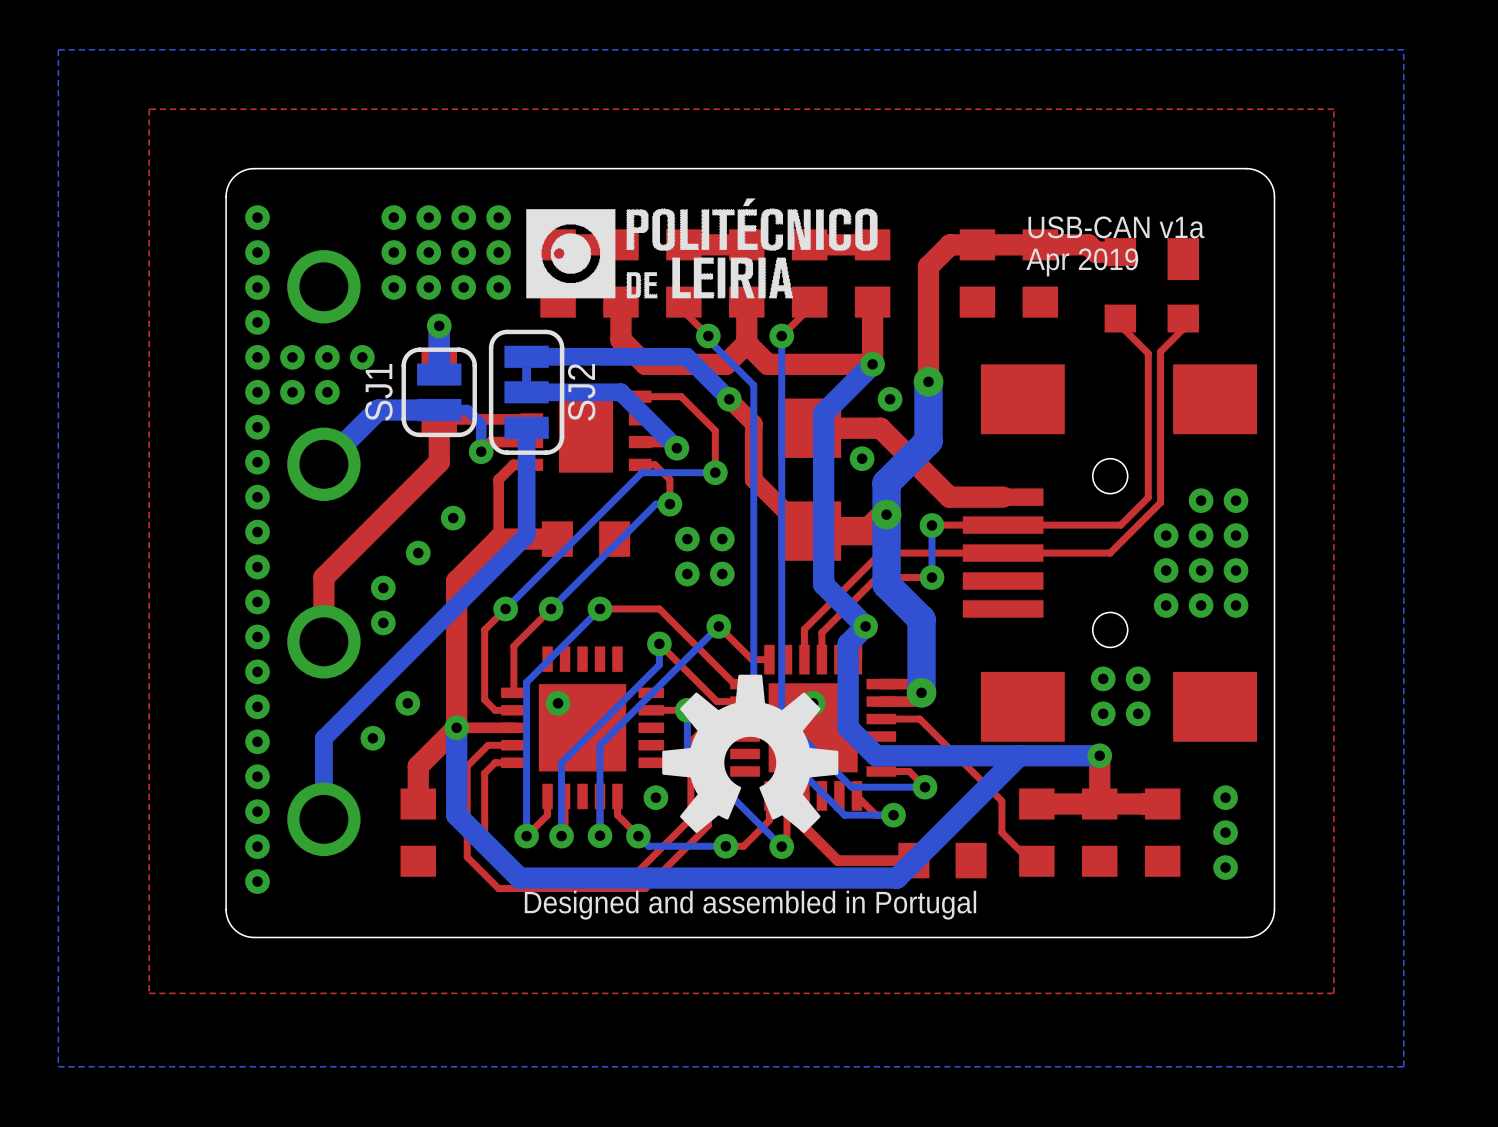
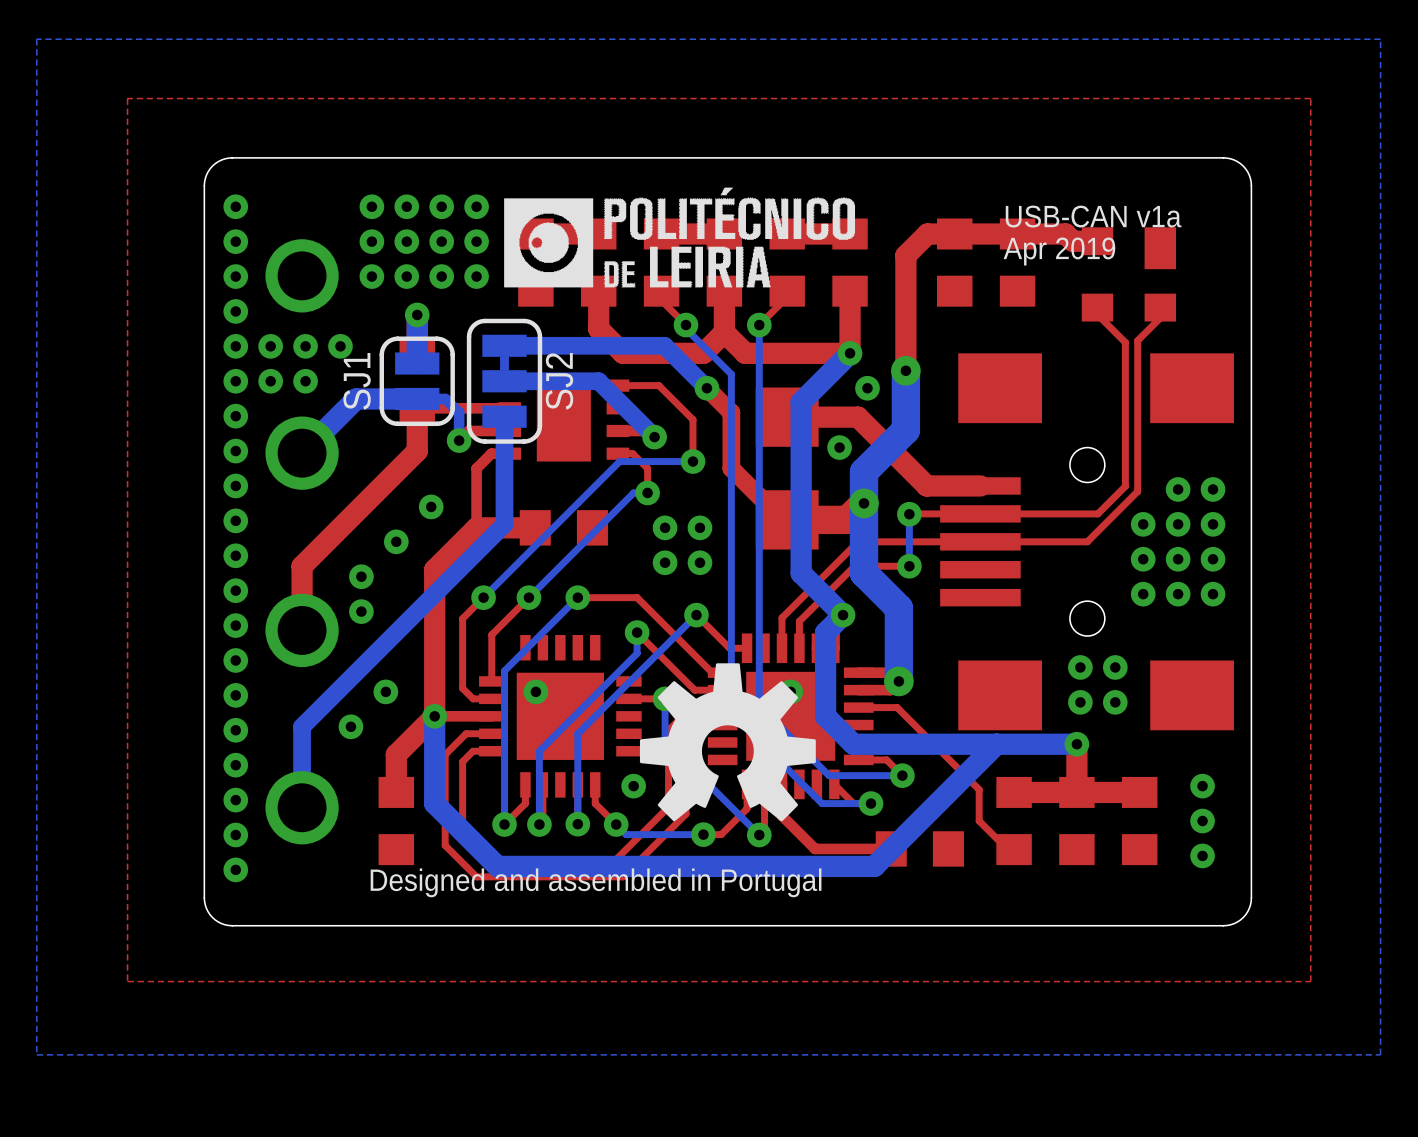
text position: Designed and assembled in Portugal (750, 905) -> Designed and assembled in Portugal (596, 882)

